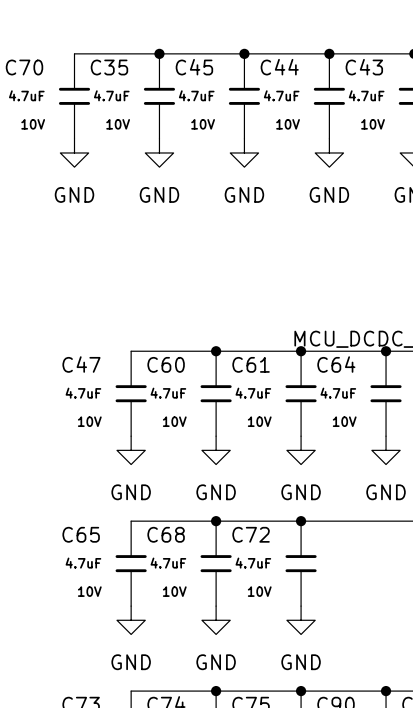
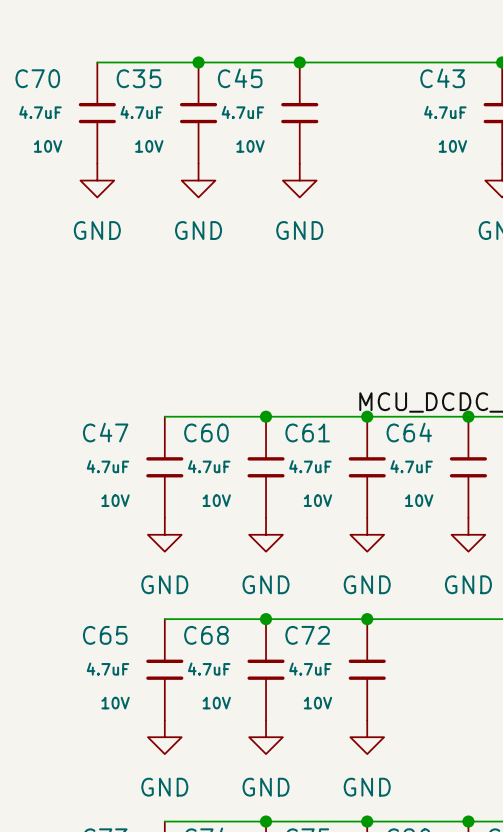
junction: (329, 53) -> none
C44: 4.7uF (329, 96) -> none
power symbol: GND (329, 152) -> none

